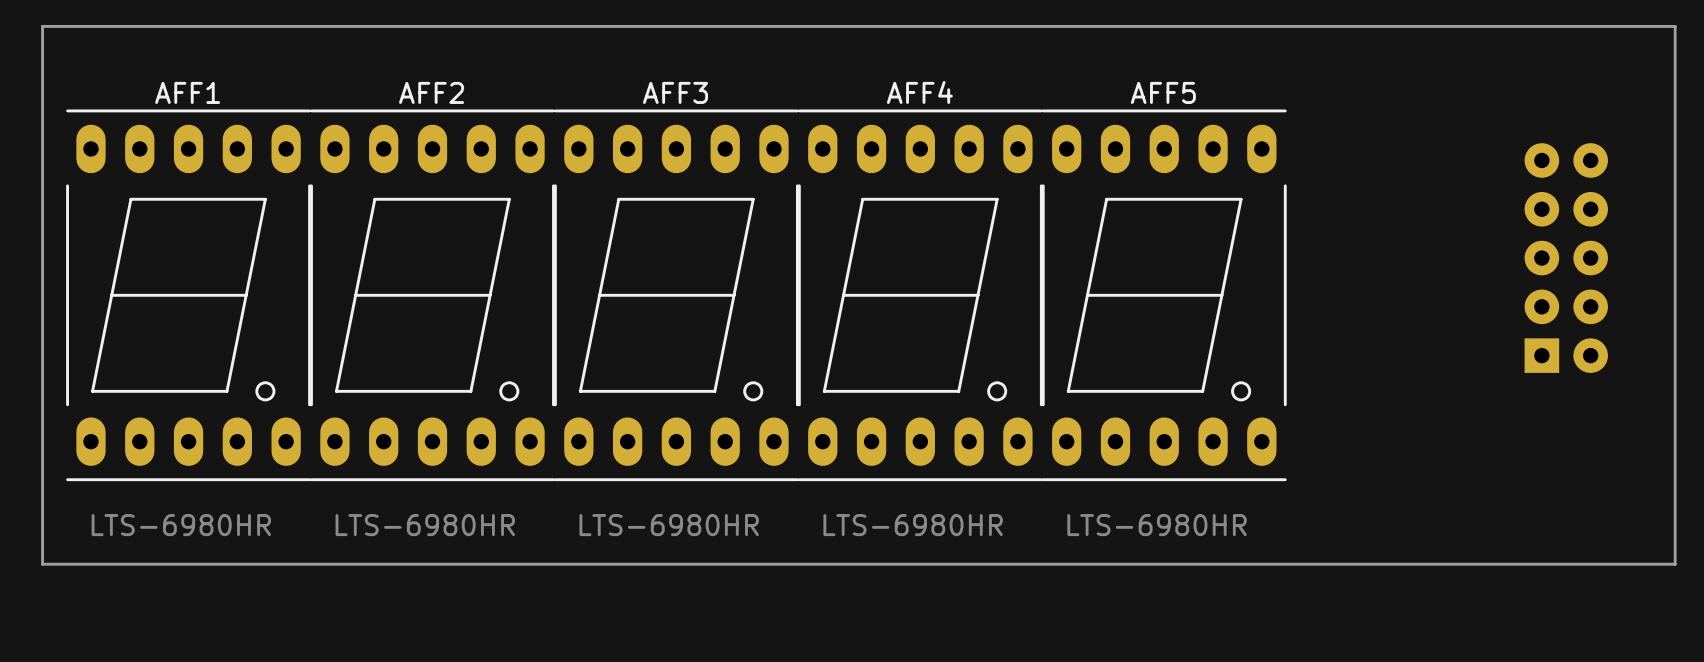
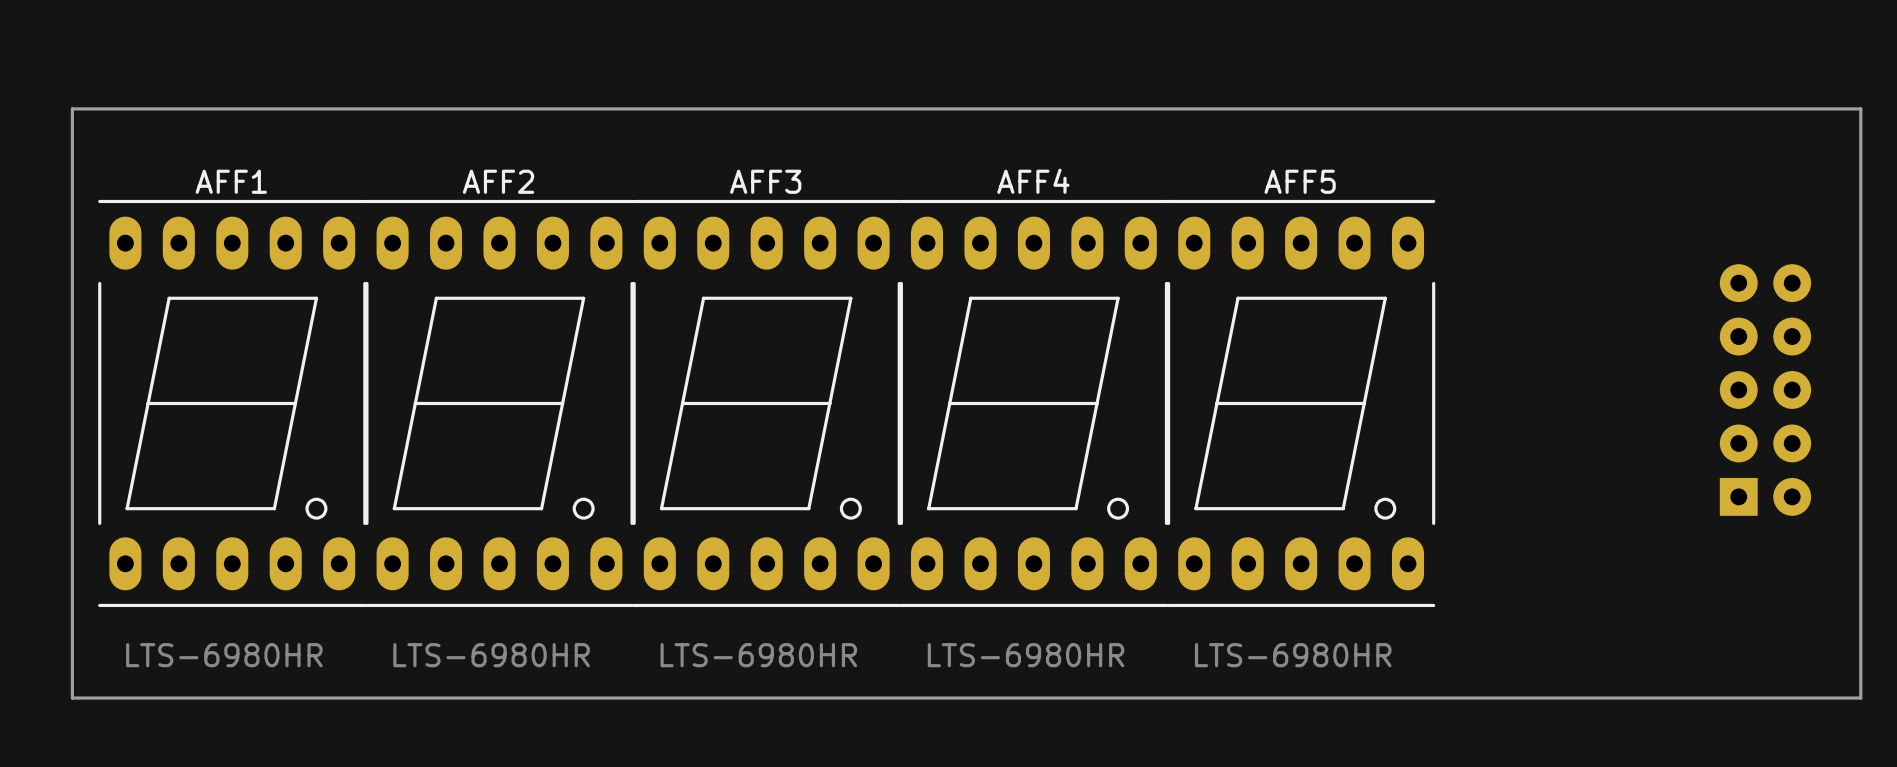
part position: (1566, 258) -> (1765, 390)

